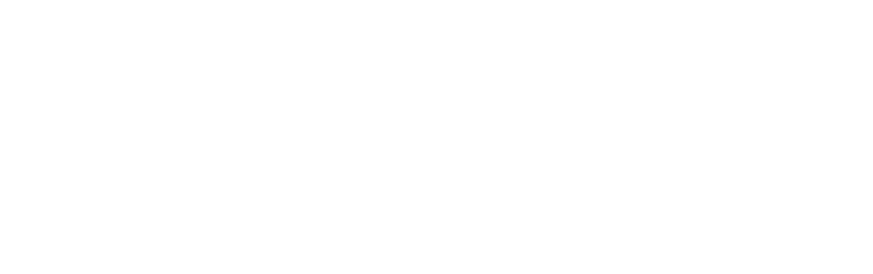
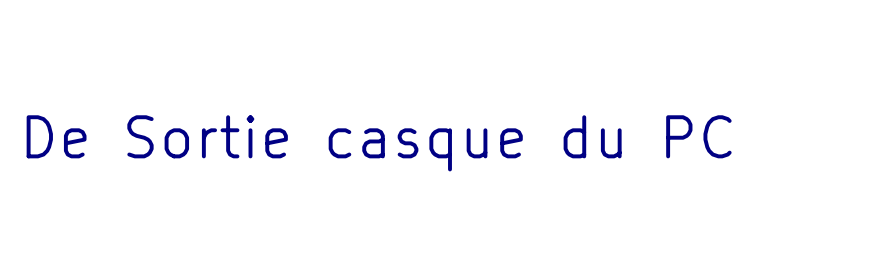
text: none -> De Sortie casque du PC (379, 143)

